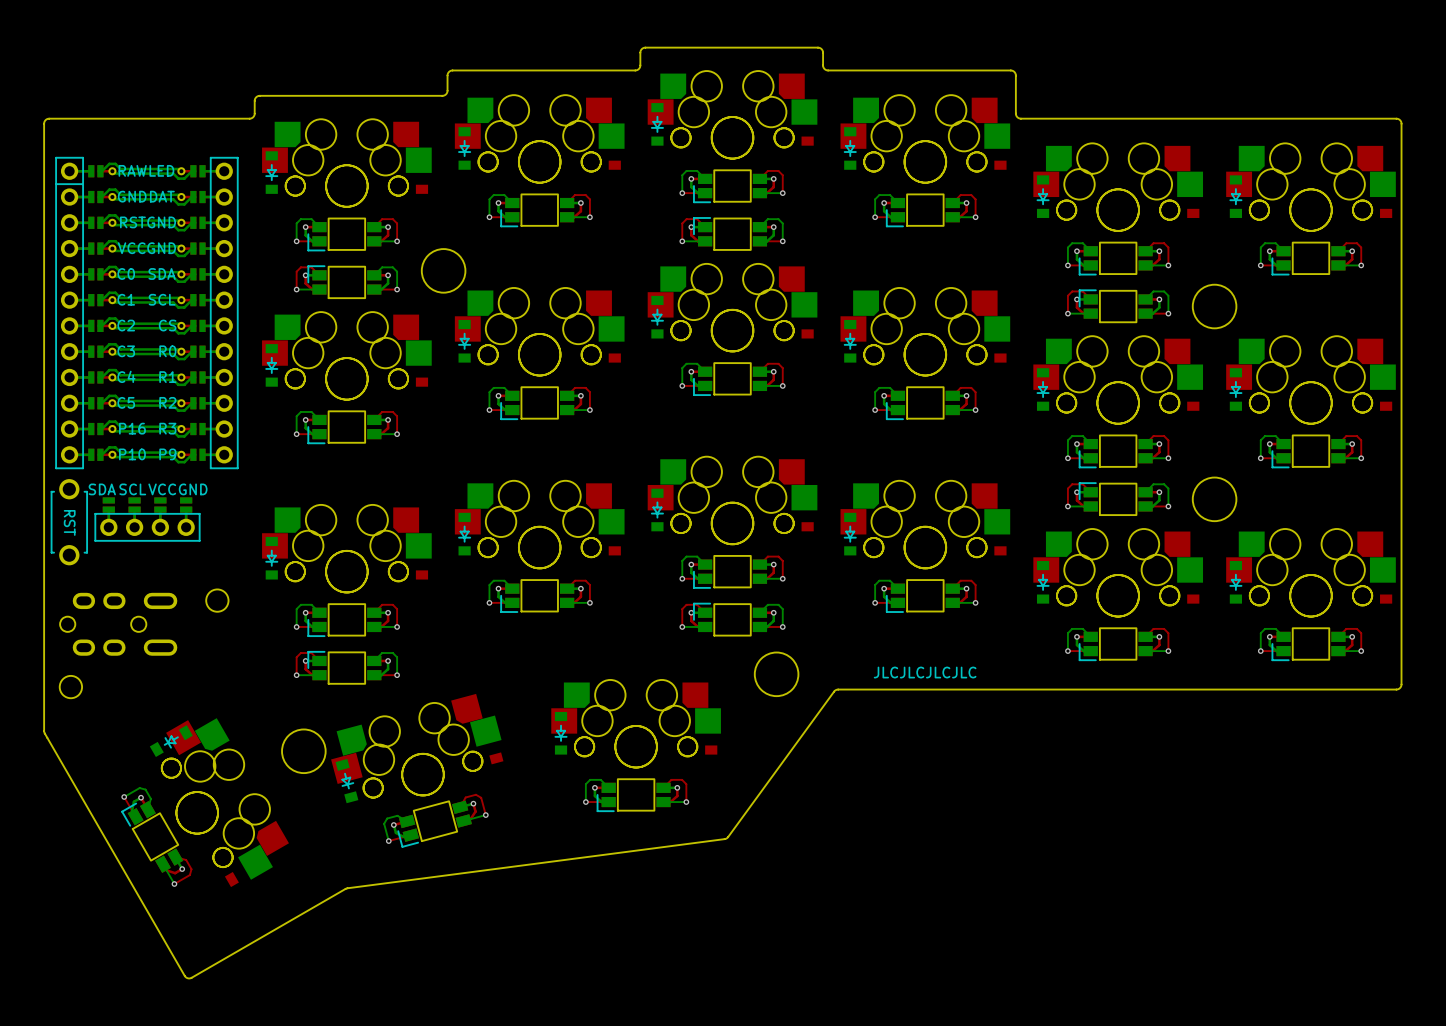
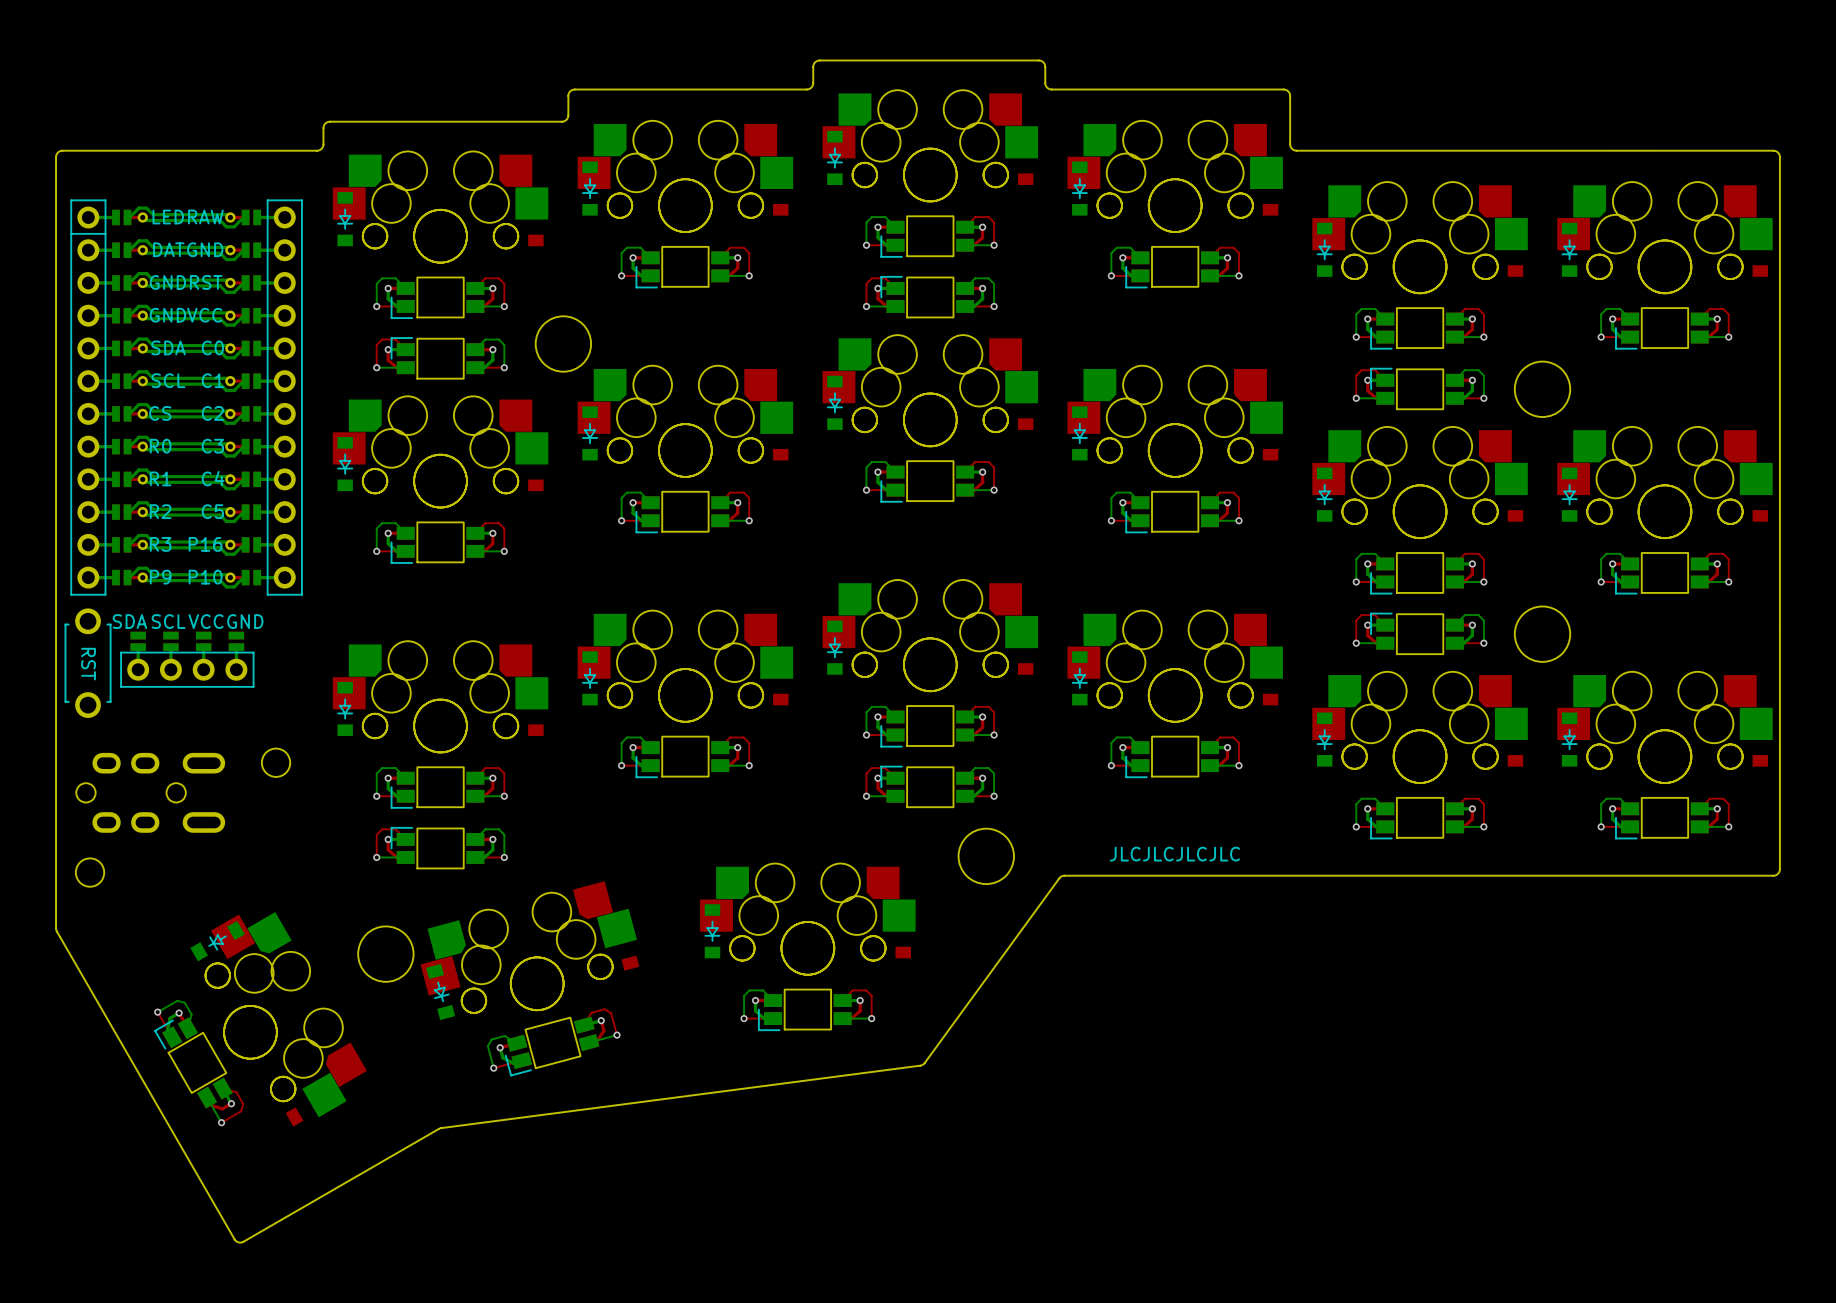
part footprint: [55, 157, 239, 469] -> [70, 199, 303, 596]

